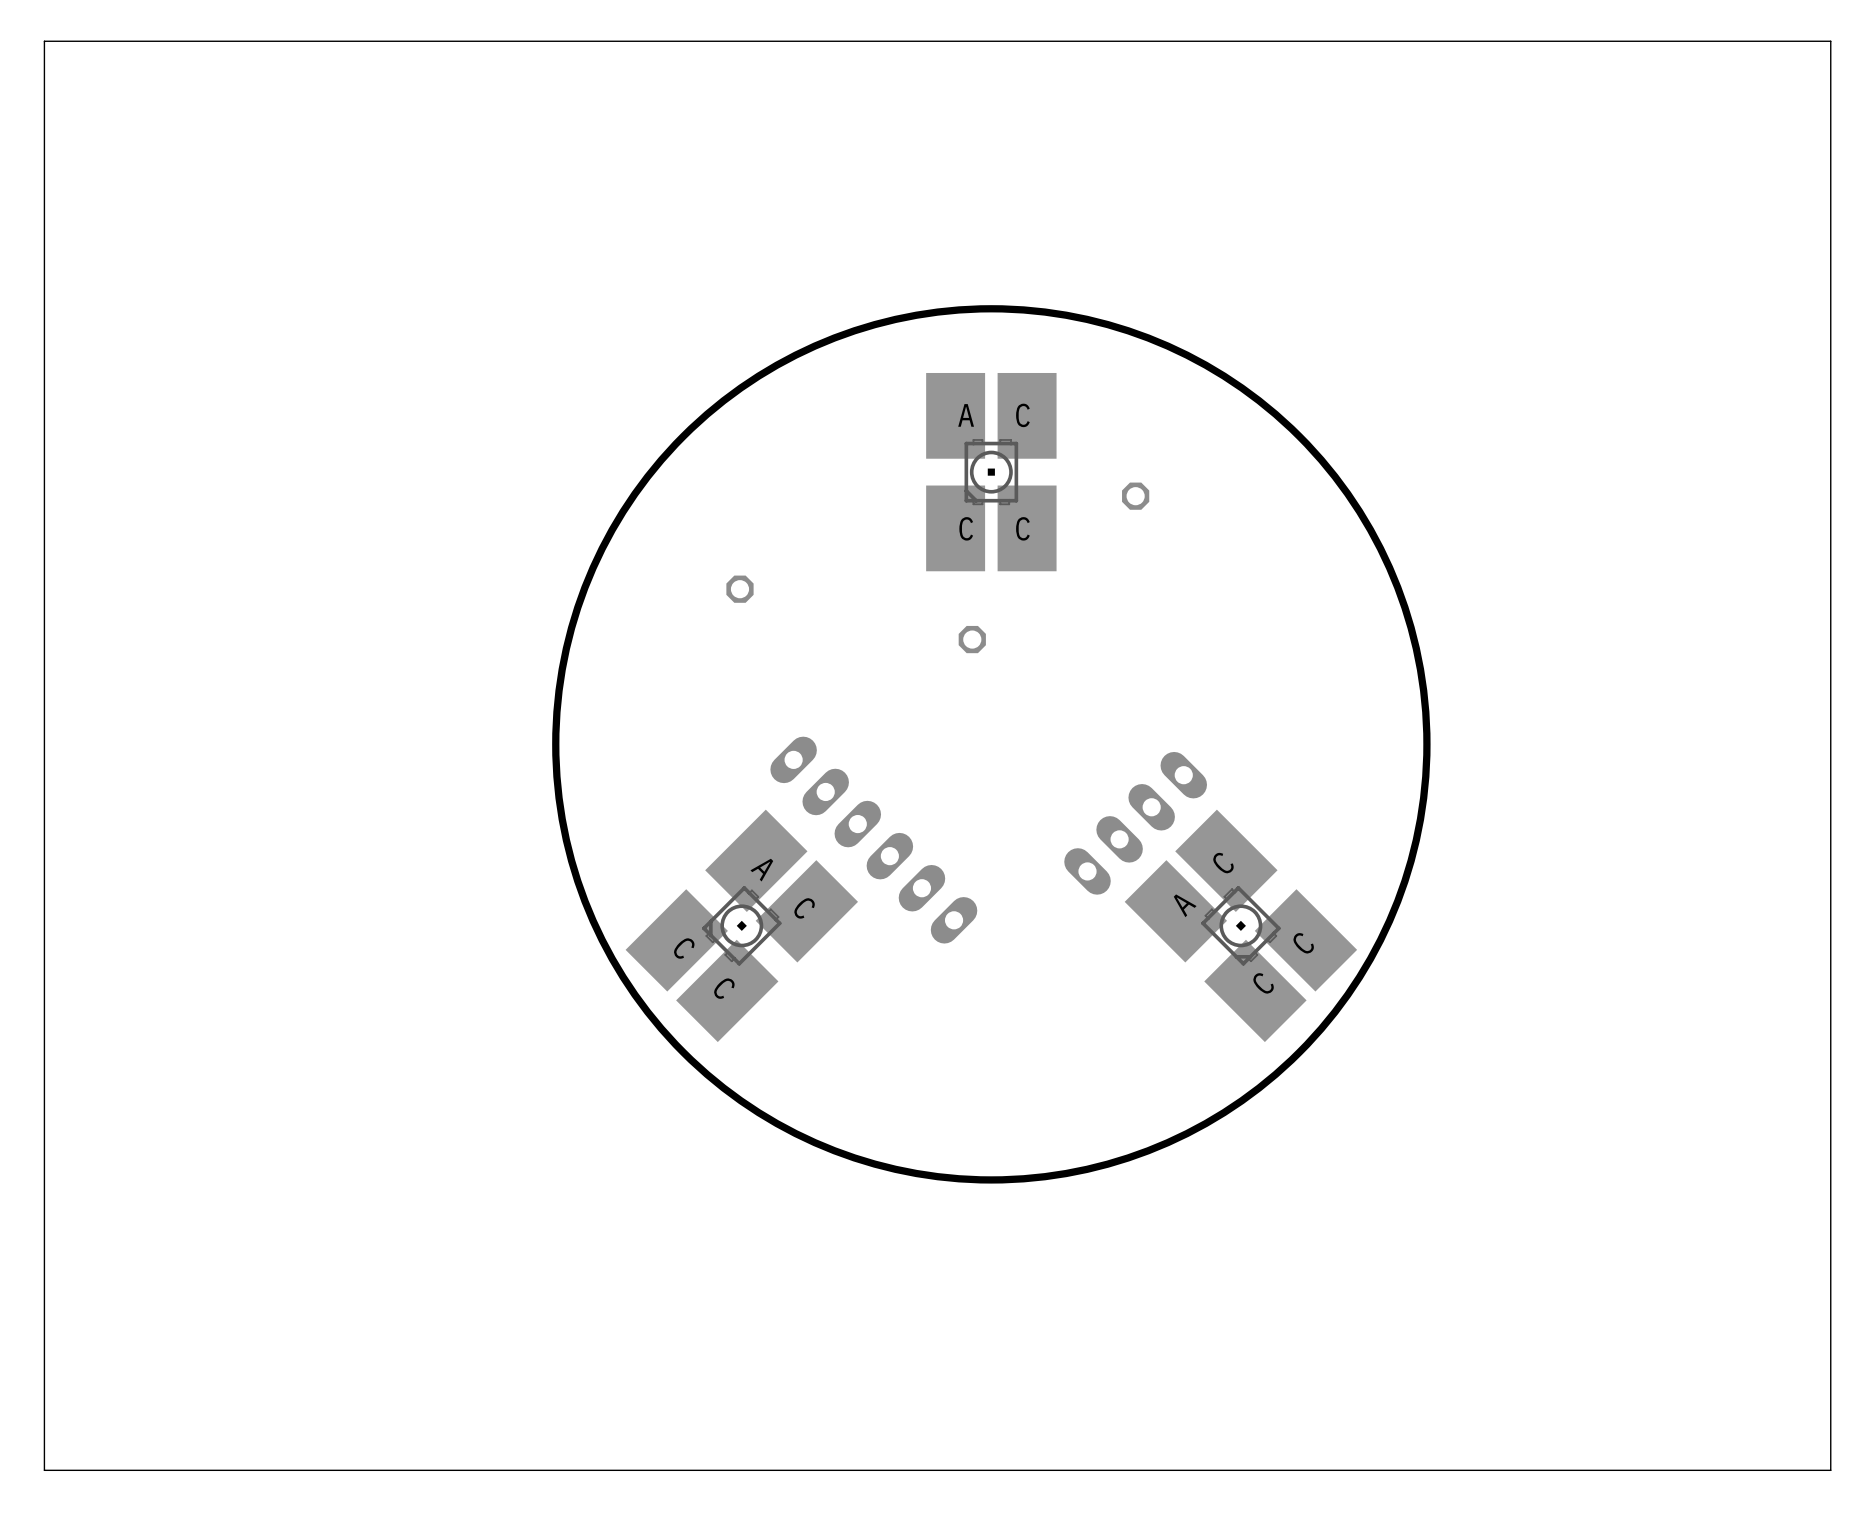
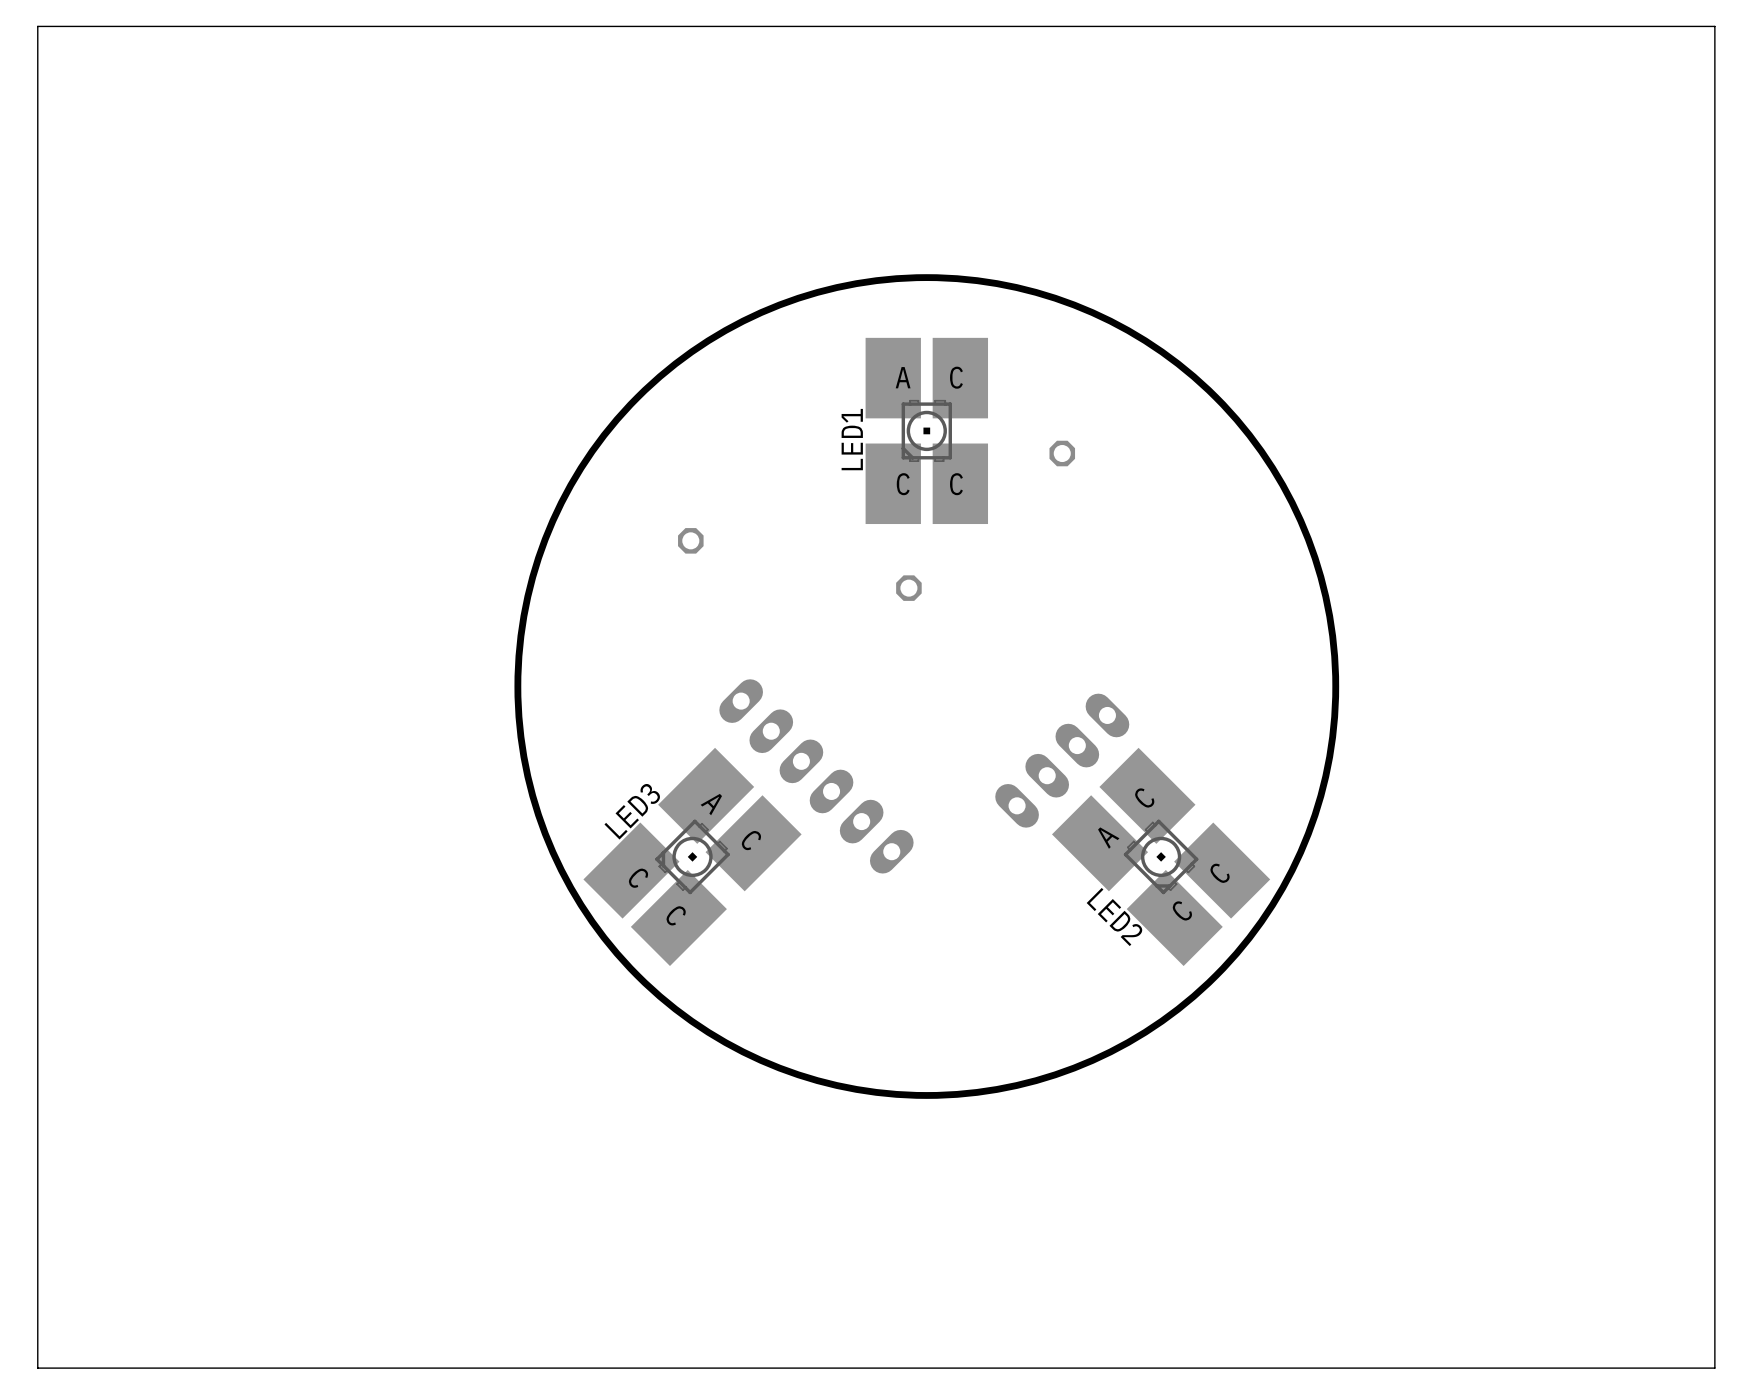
LED1 name: none -> LED1 (852, 439)
LED3 name: none -> LED3 (632, 811)
LED2 name: none -> LED2 (1114, 917)

